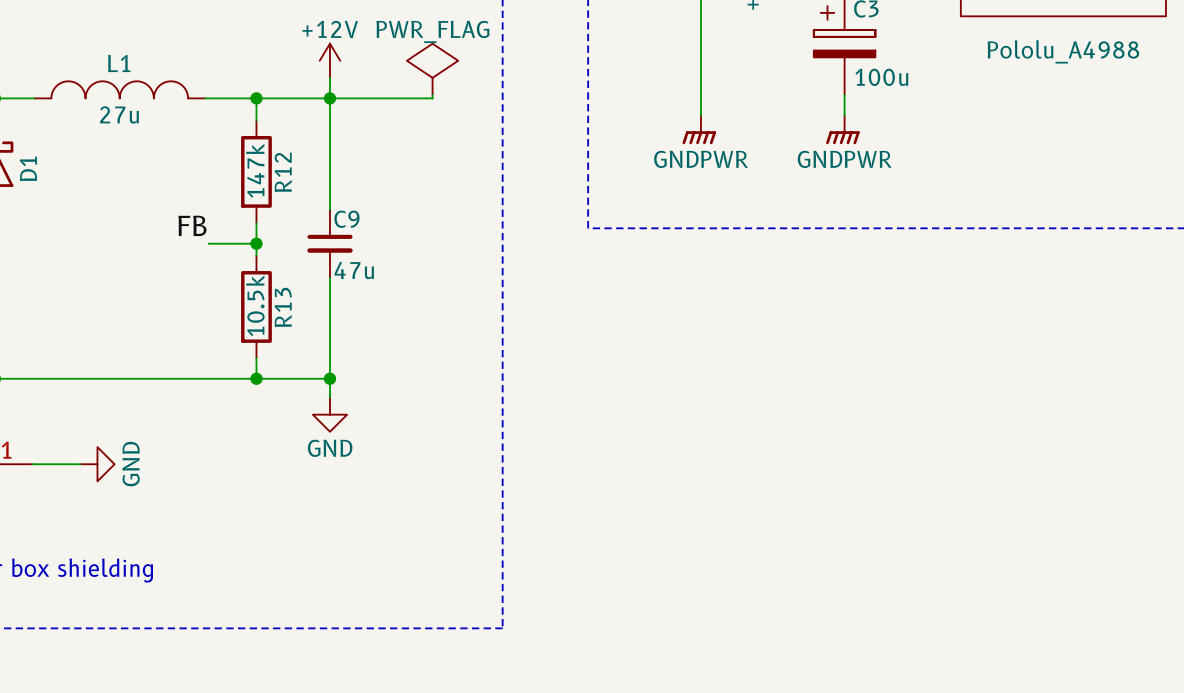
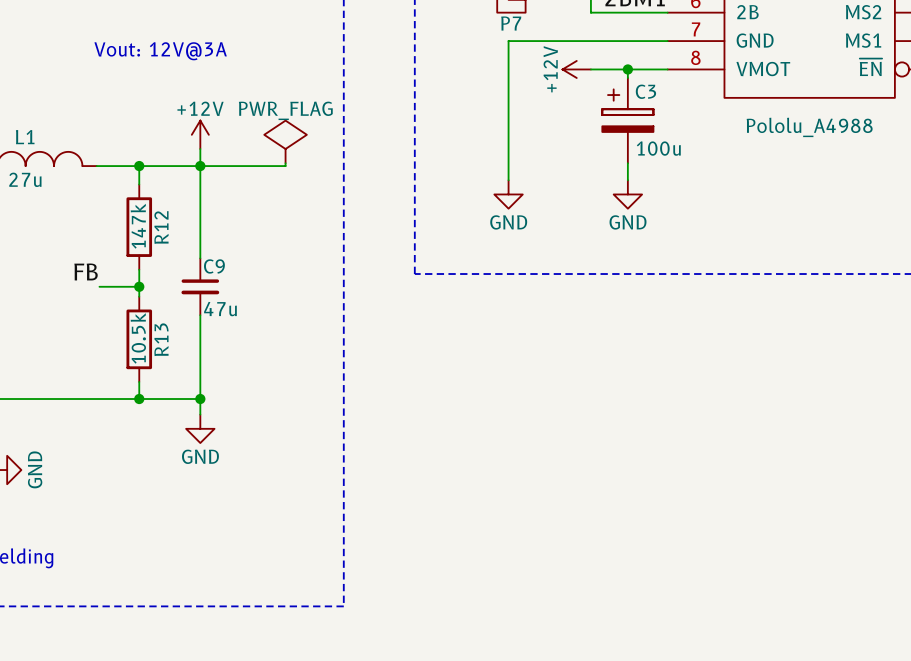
power symbol: GNDPWR (699, 129) -> GND (508, 194)
power symbol: GNDPWR (842, 129) -> GND (627, 194)

